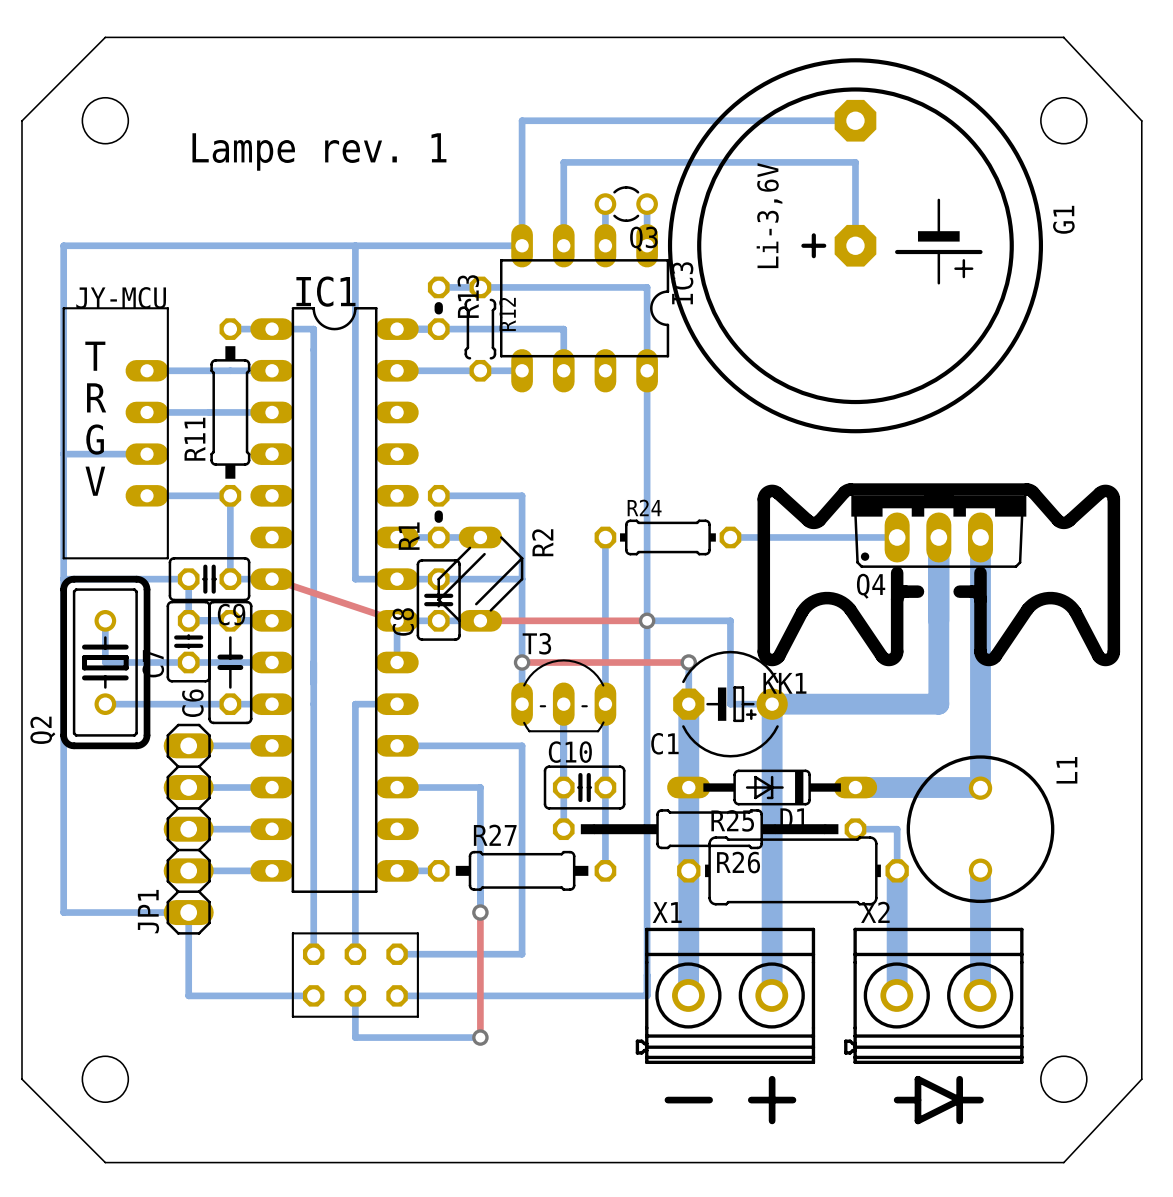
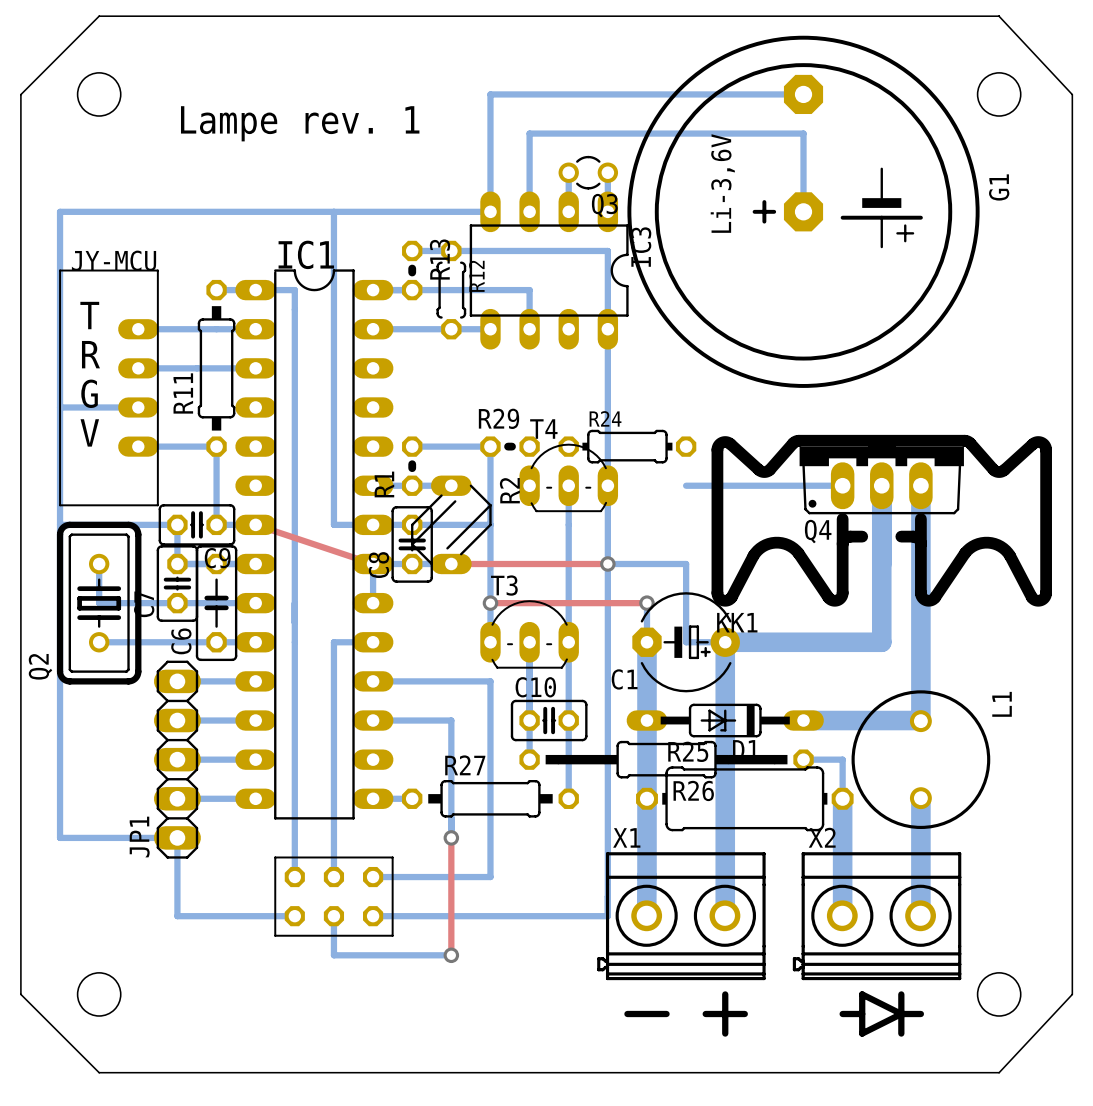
R29: none -> (510, 446)
T4: none -> (568, 477)
R24 position: (667, 537) -> (627, 446)

